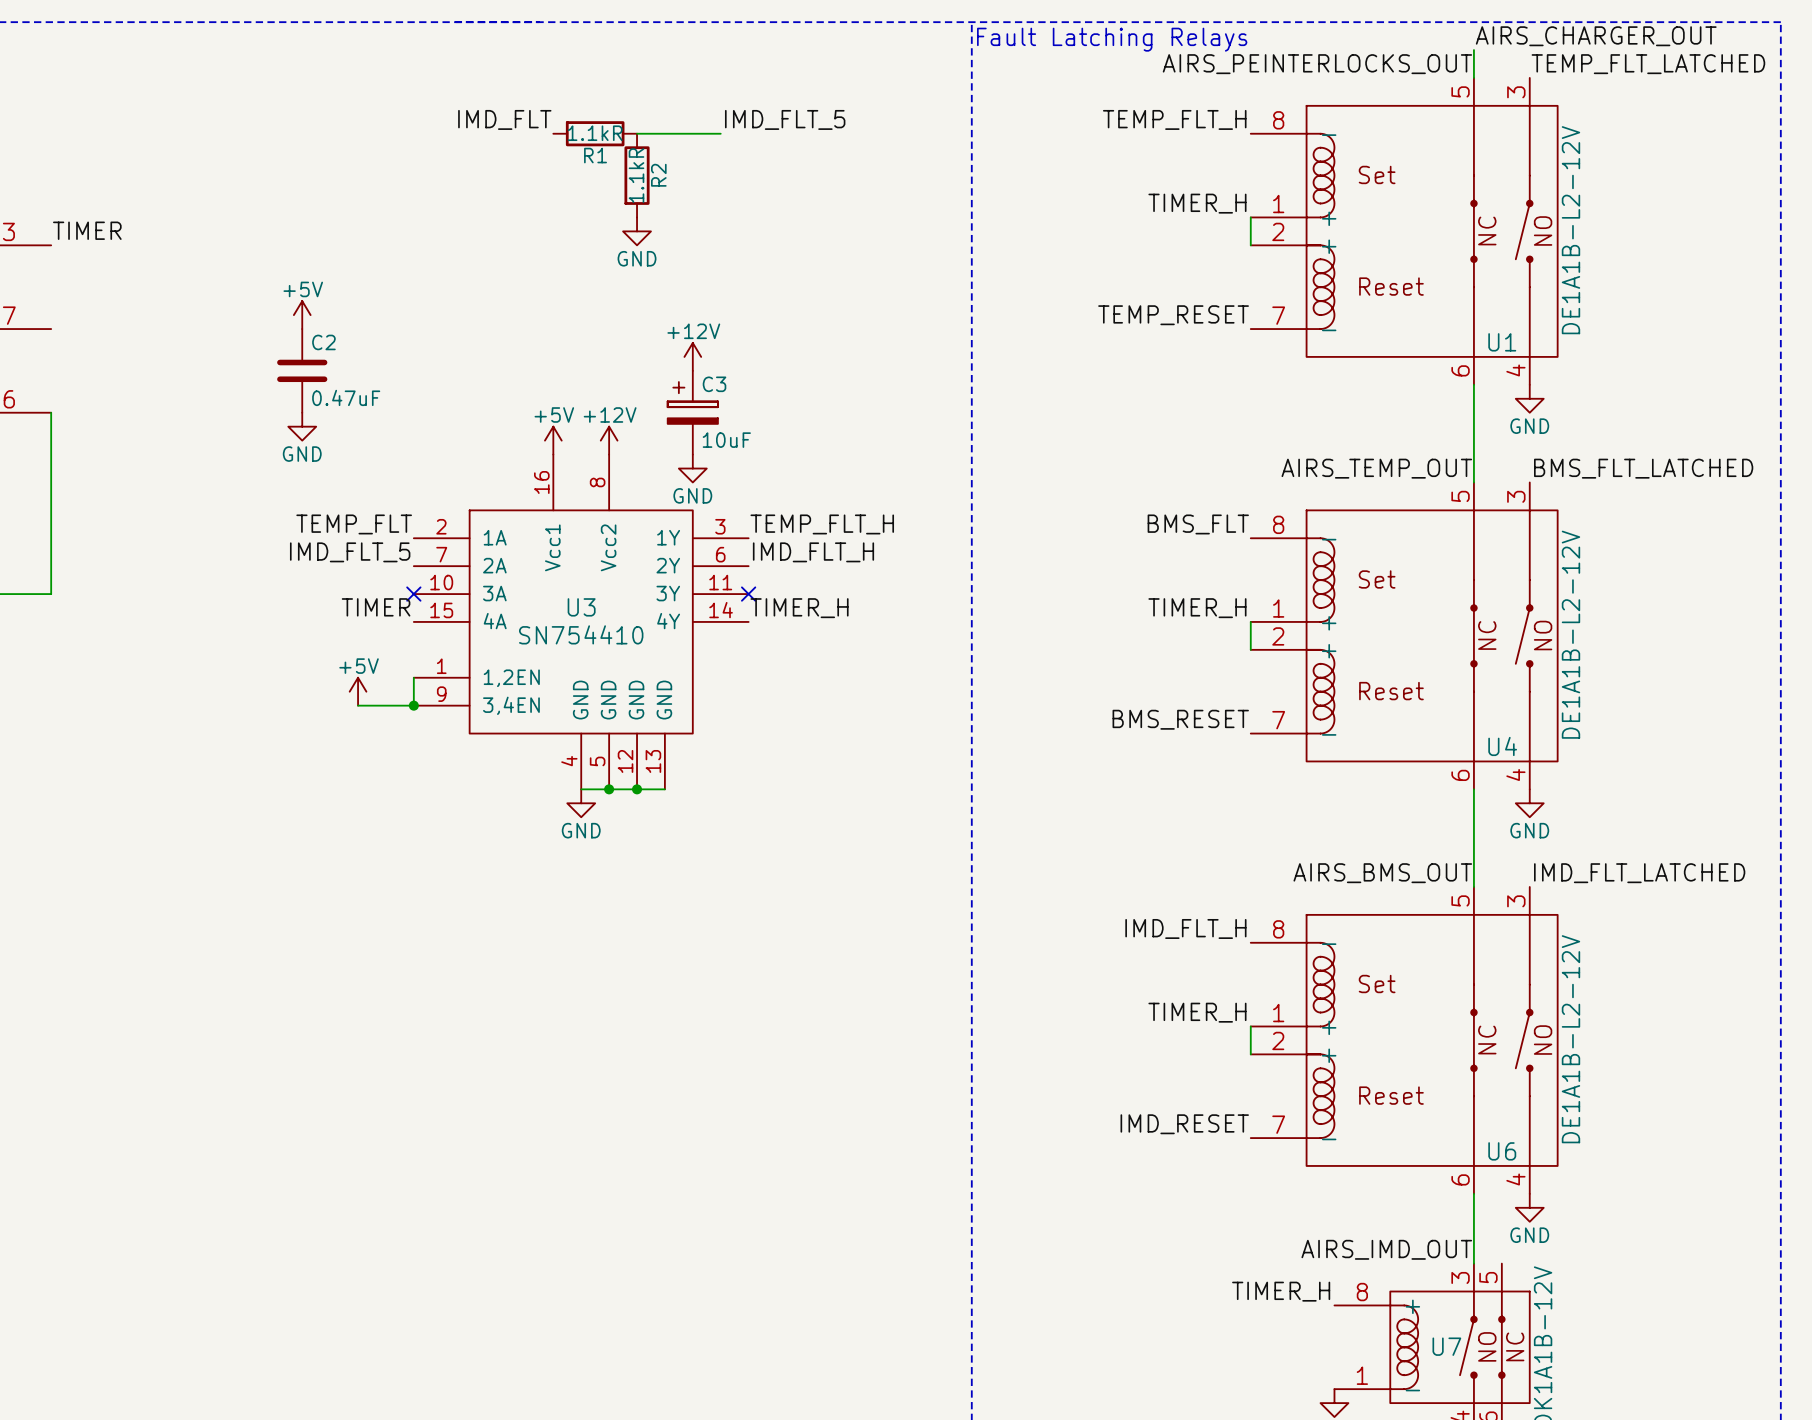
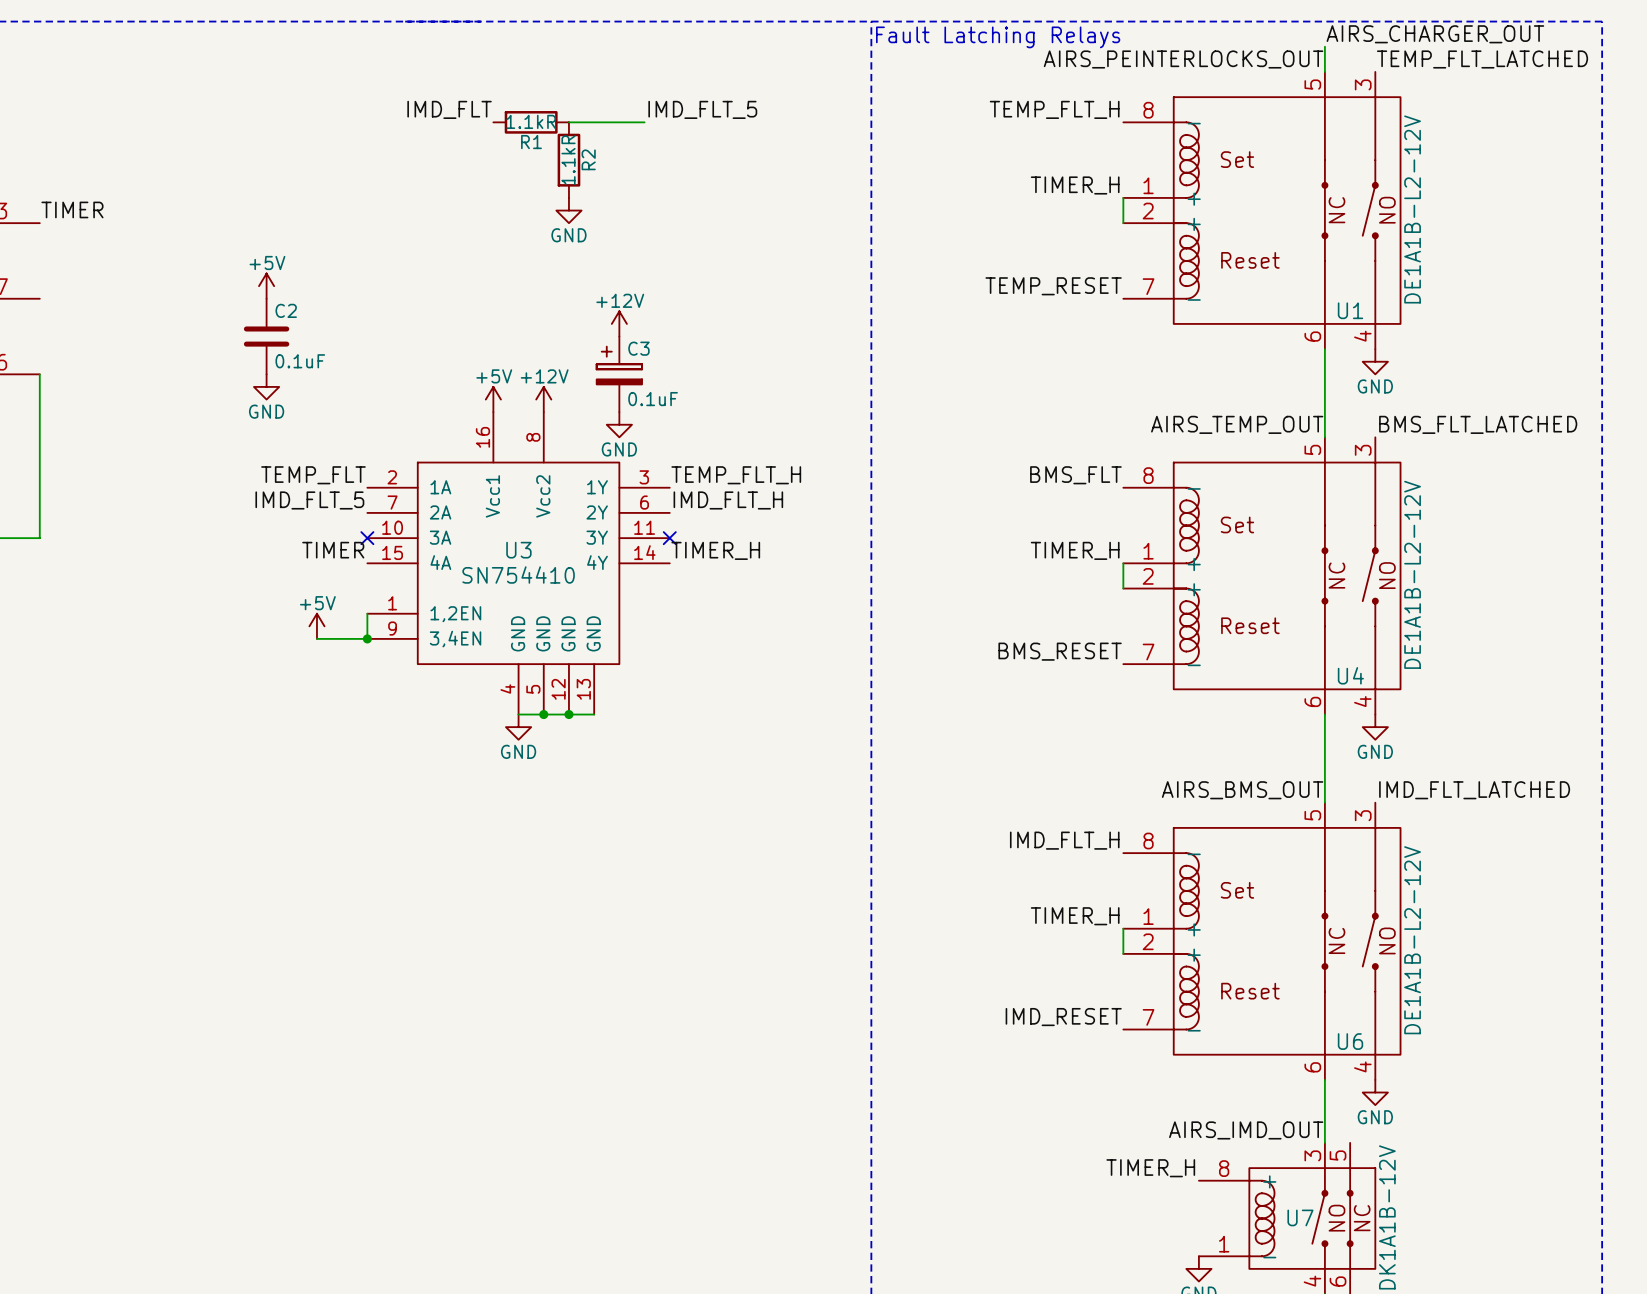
C2 value: 0.47uF (346, 397) -> 0.1uF (300, 361)
C3 value: 10uF (726, 440) -> 0.1uF (653, 399)

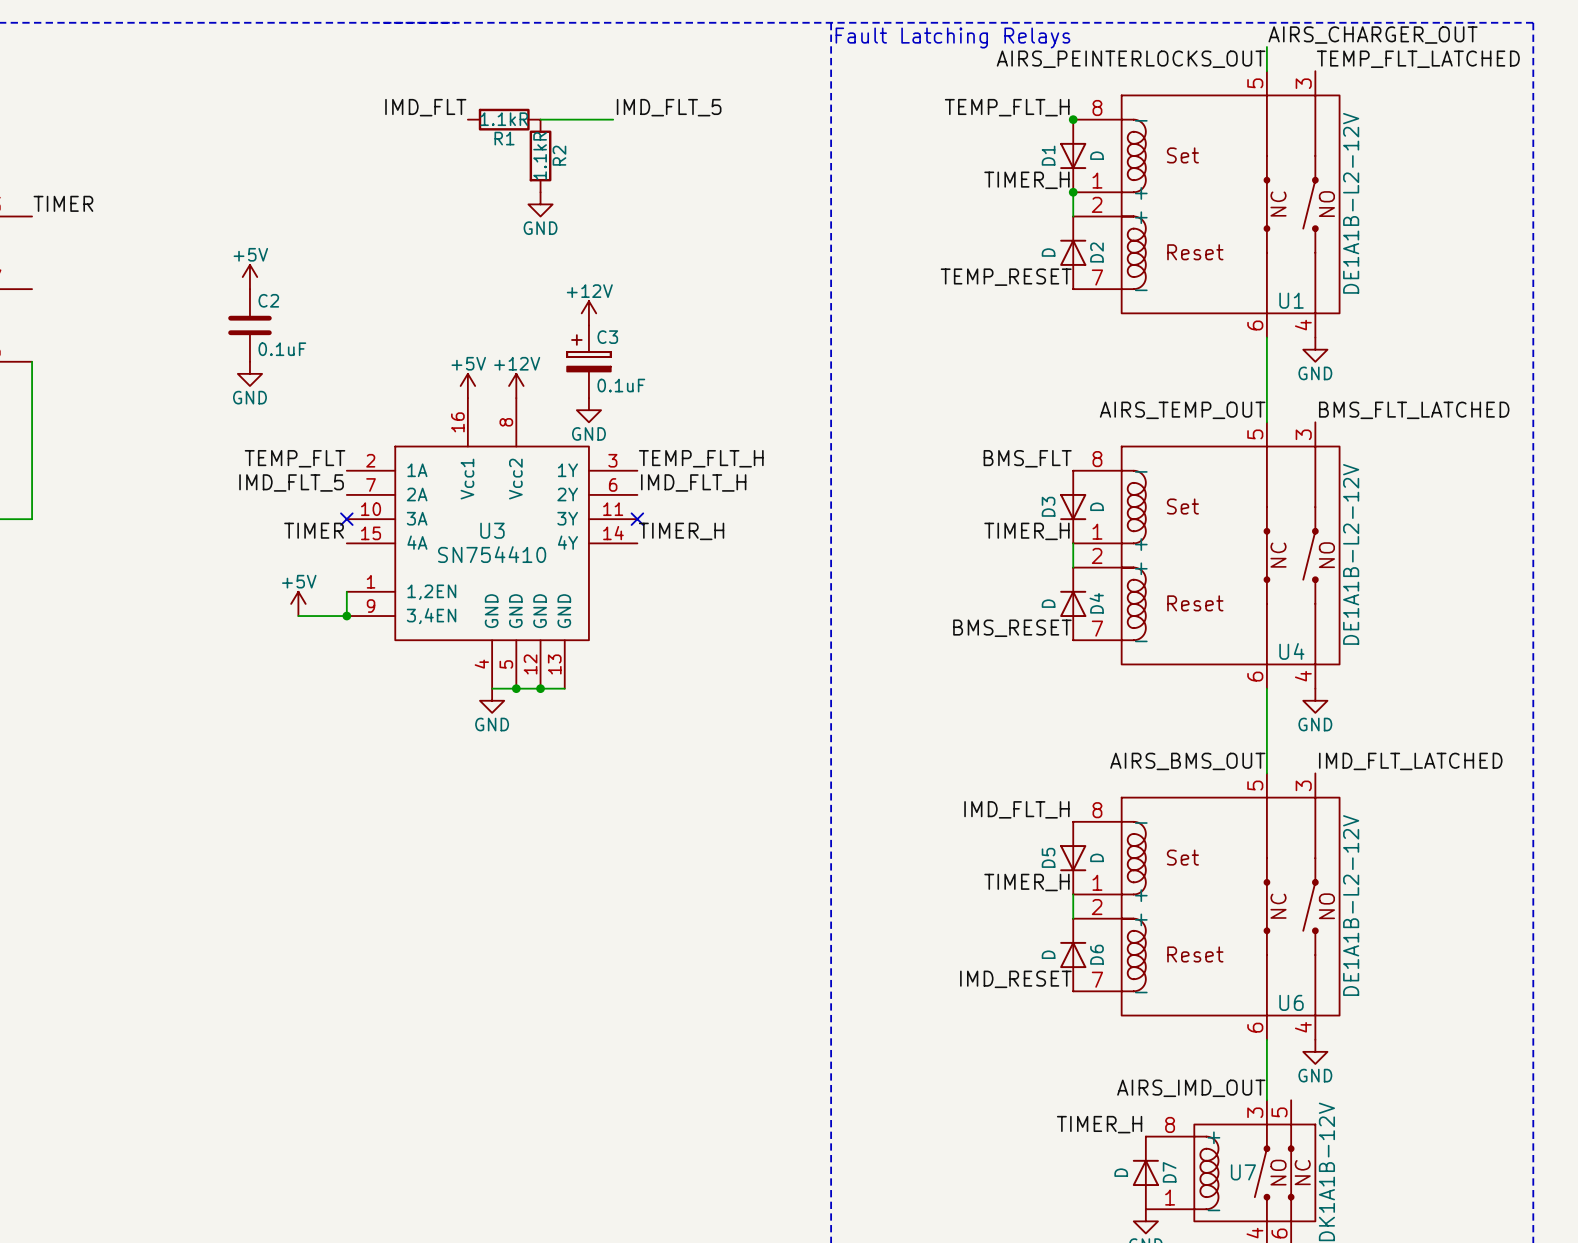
junction: none -> (1073, 119)
D1: none -> D (1073, 155)
junction: none -> (1073, 192)
D2: none -> D (1073, 252)
D3: none -> D (1073, 507)
D4: none -> D (1073, 603)
D5: none -> D (1073, 858)
D6: none -> D (1073, 955)
D7: none -> D (1145, 1172)

